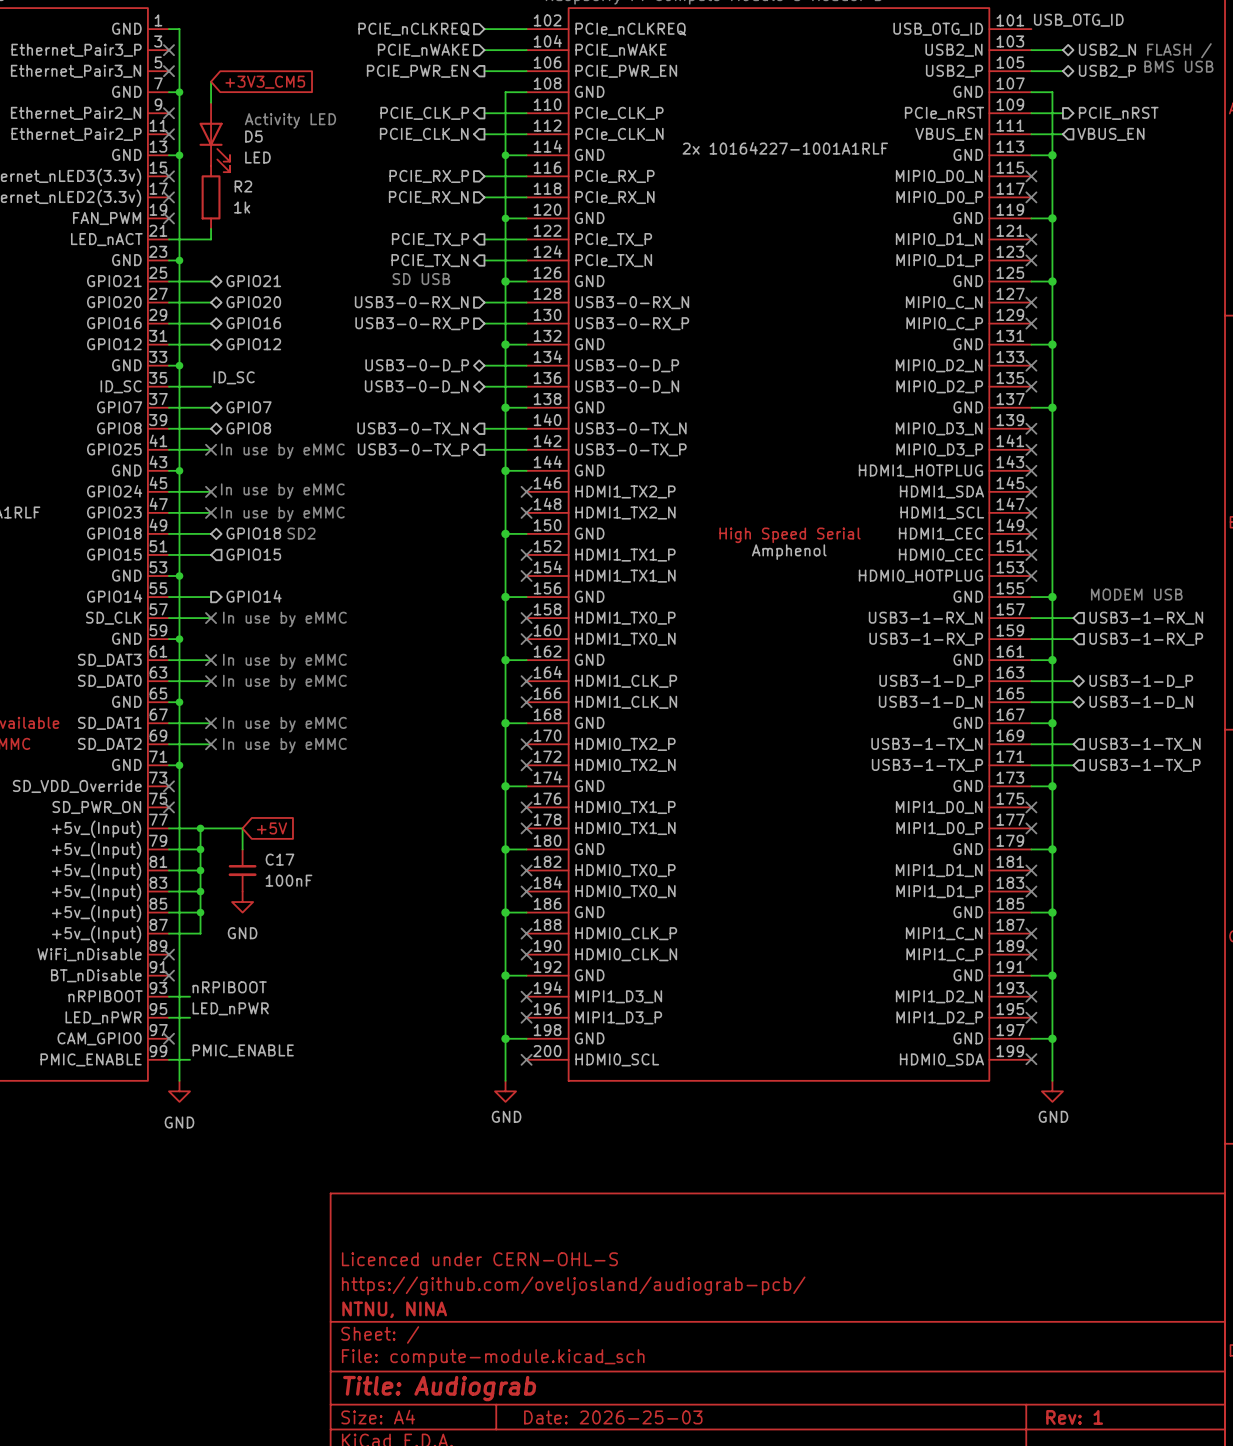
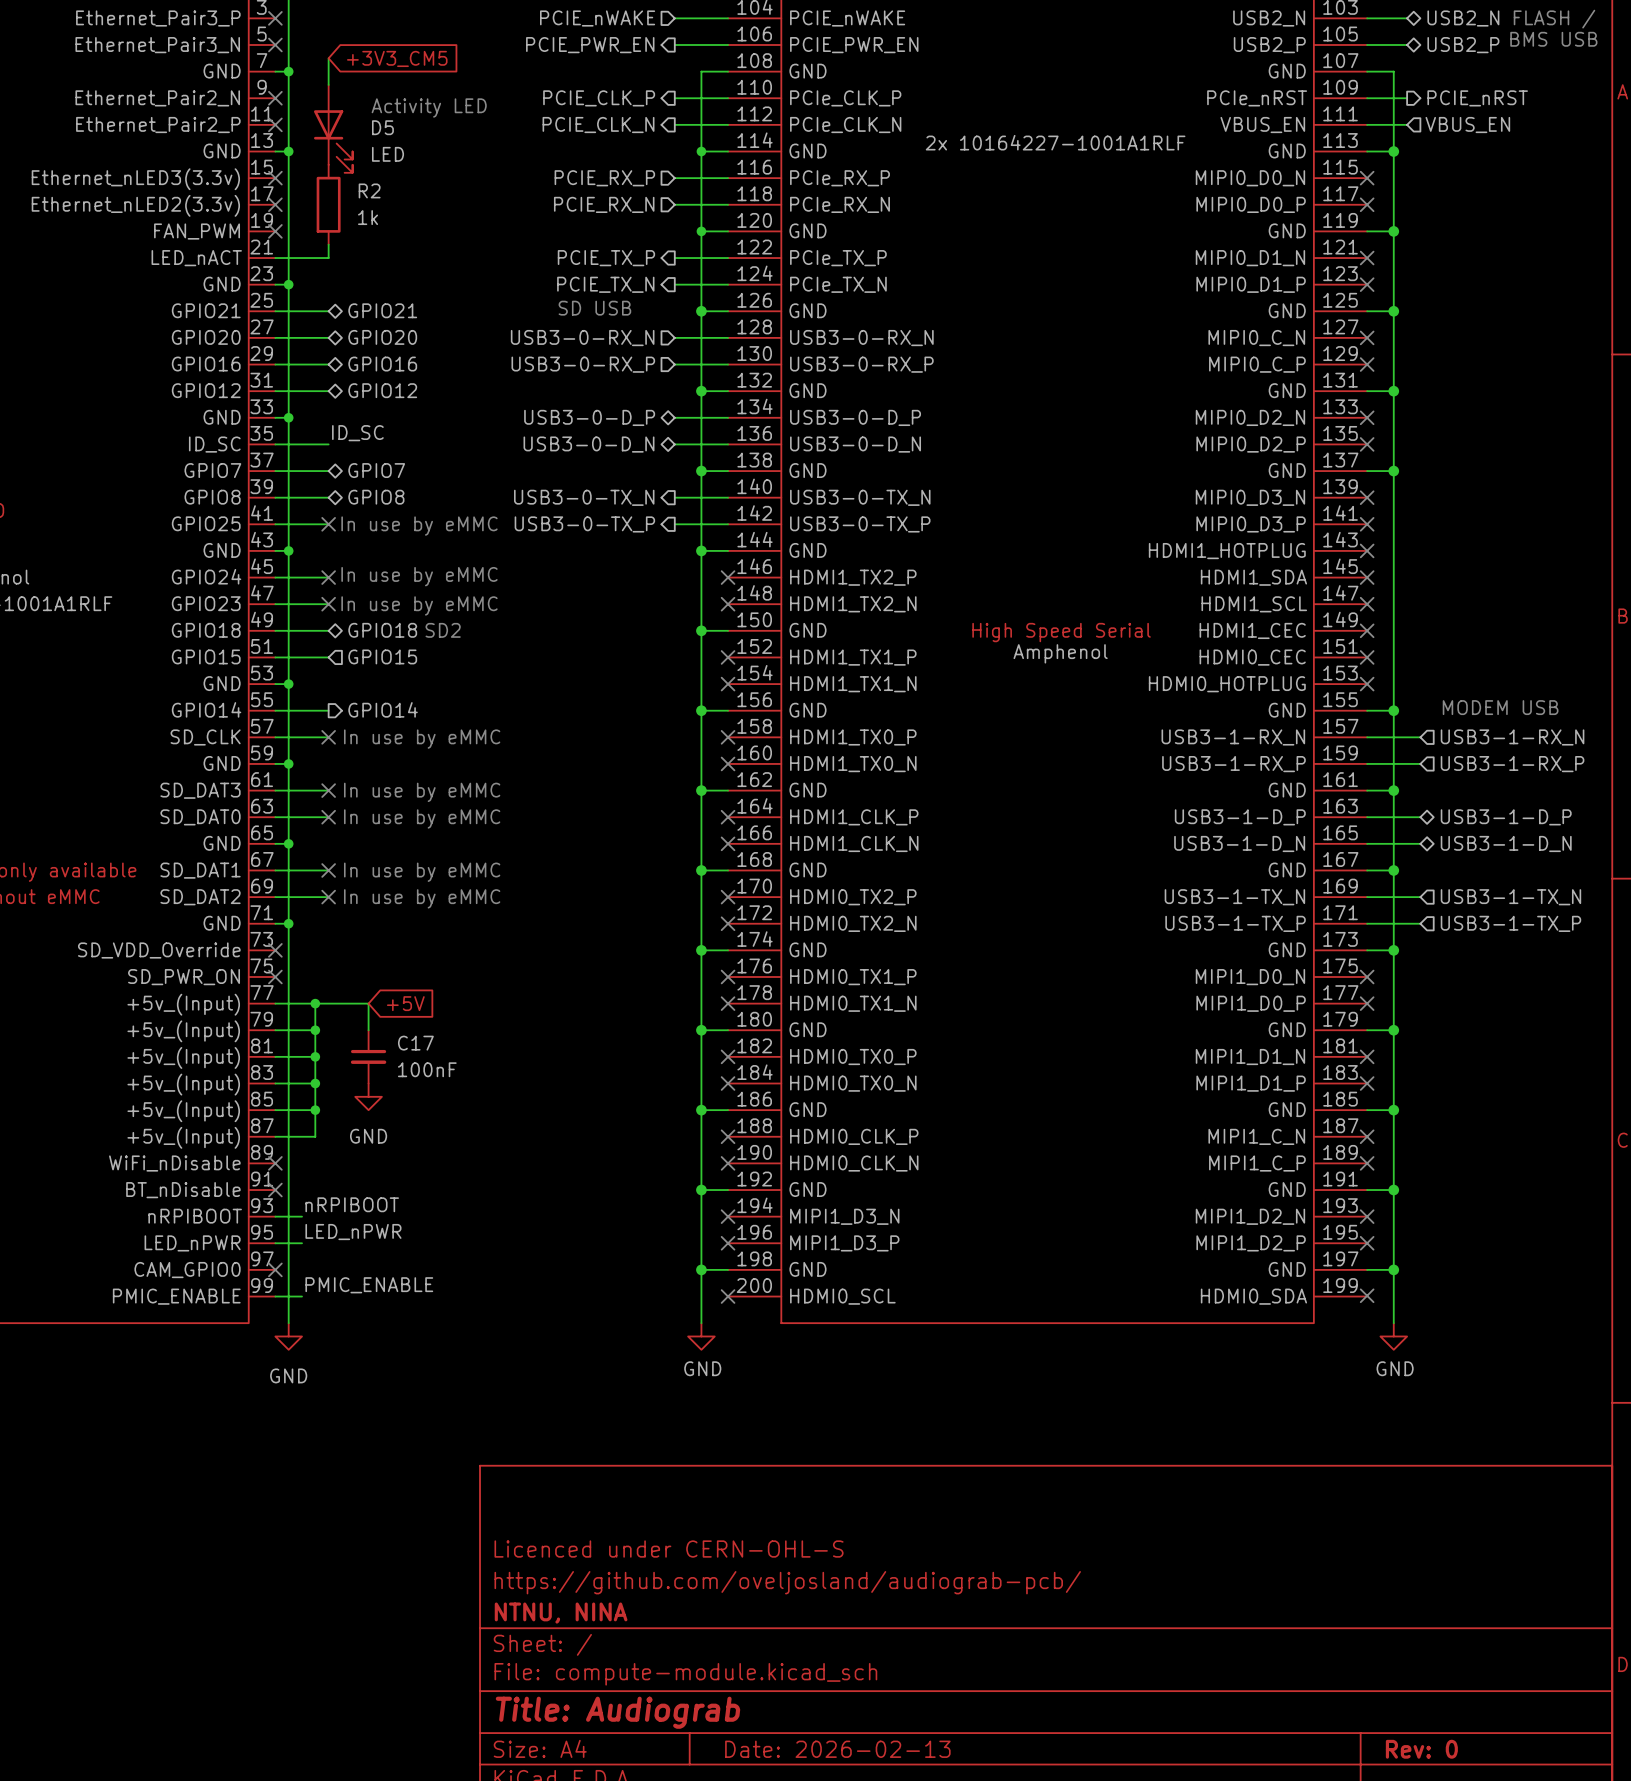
title block: Date: 2026-25-03 (613, 1417) -> Date: 2026-02-13 (837, 1749)
title block: Rev: 1 (1074, 1417) -> Rev: 0 (1421, 1749)

